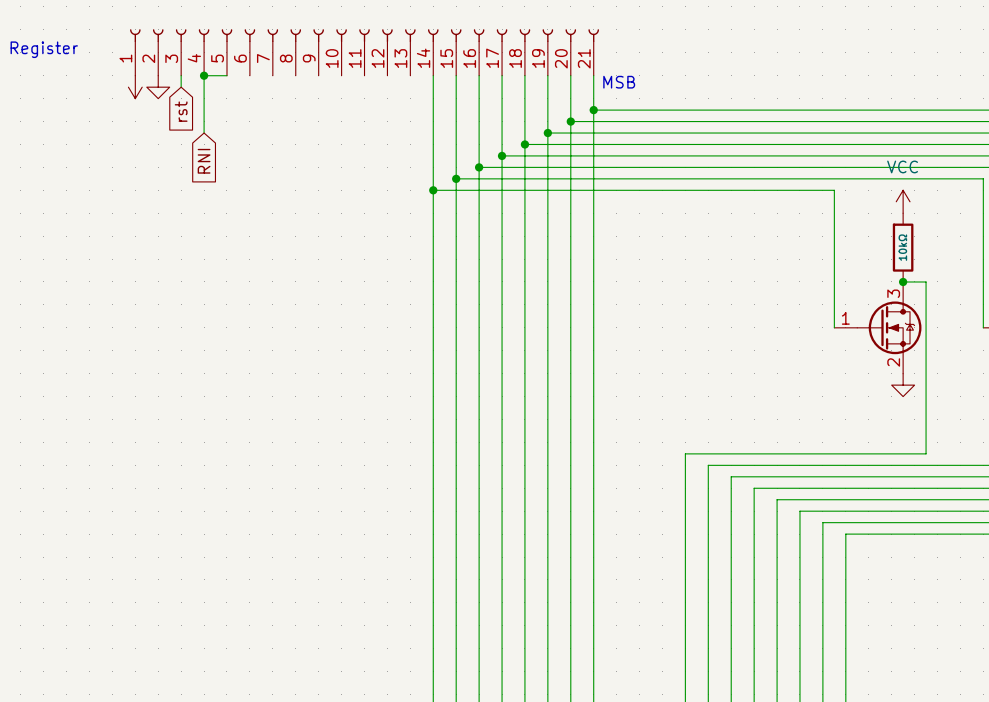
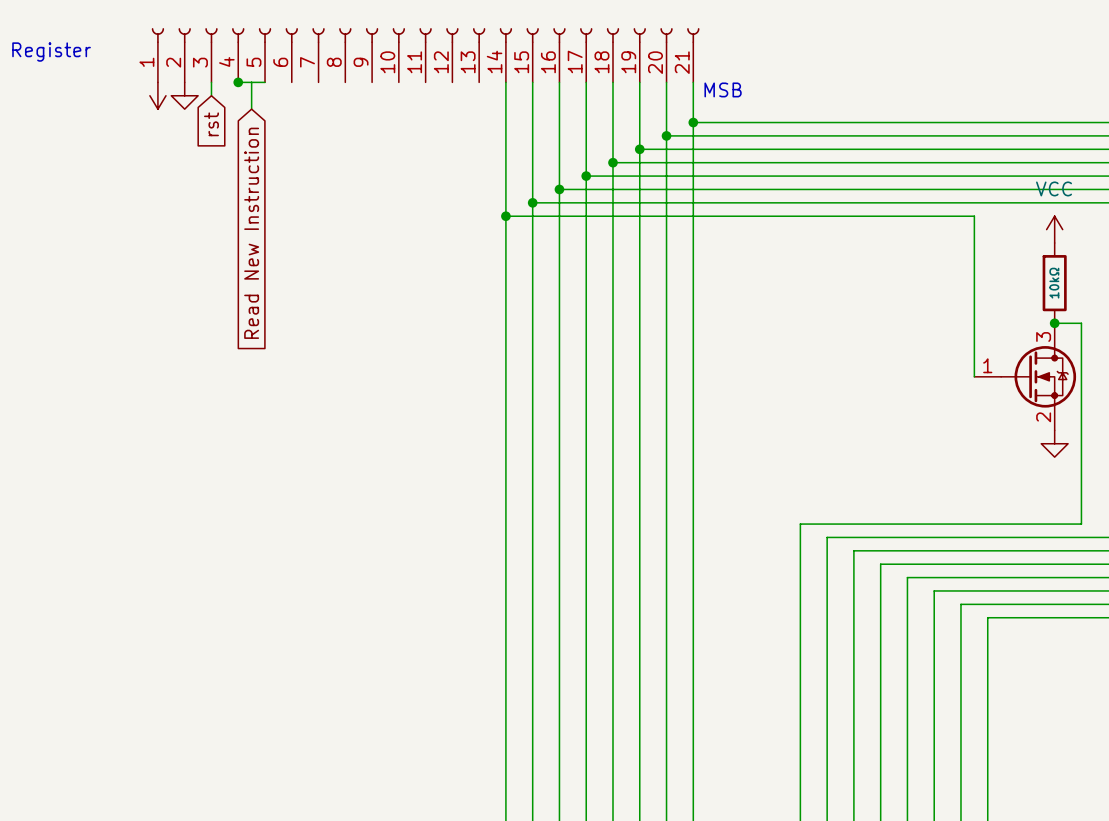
wire: (204, 75) (204, 133) -> none
wire: none -> (251, 82) (251, 109)
global label: RNI (204, 161) -> none
global label: none -> Read New Instruction (251, 233)

